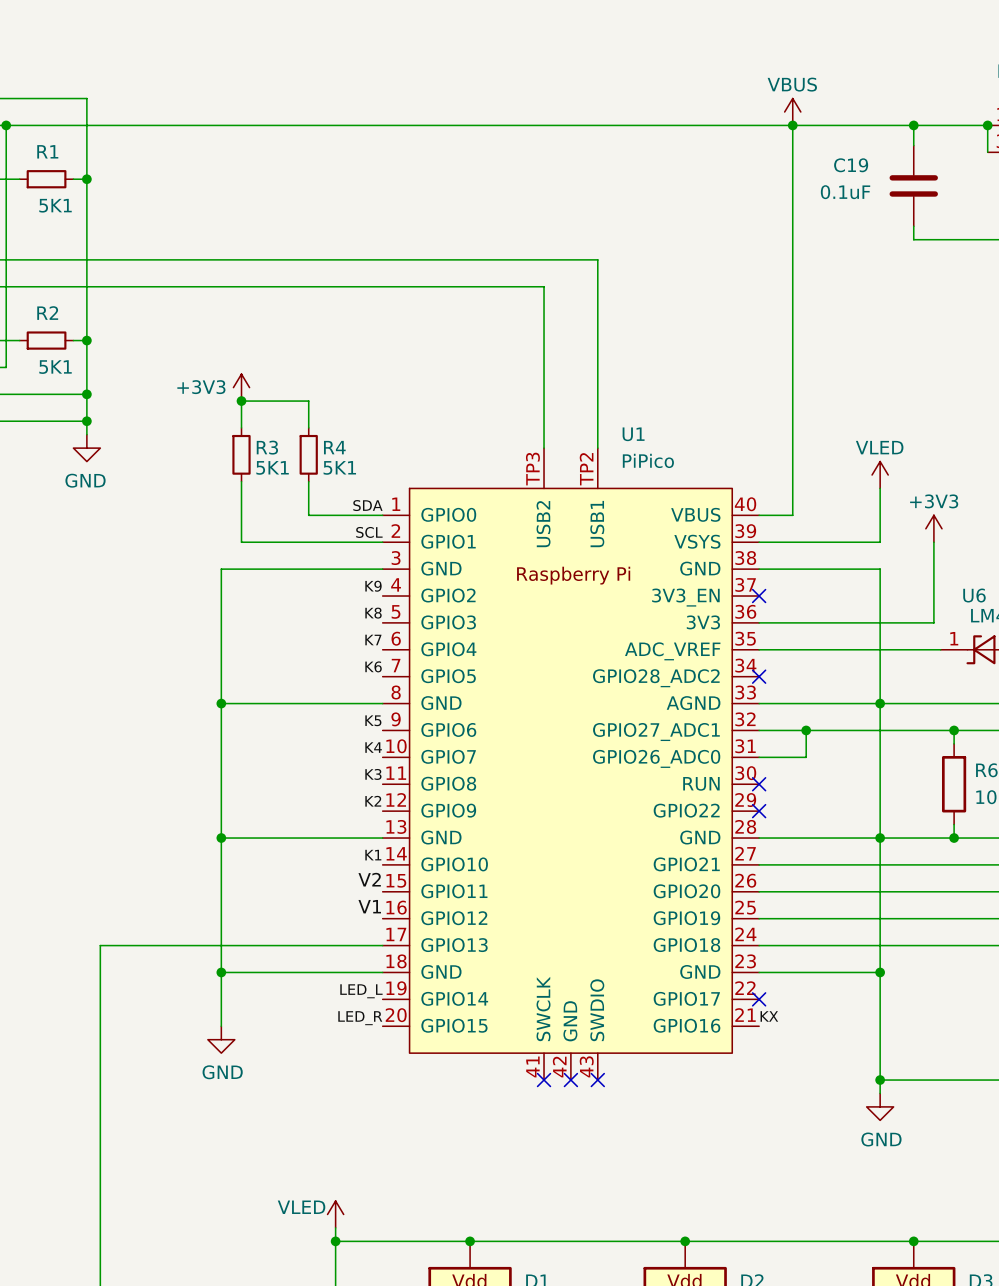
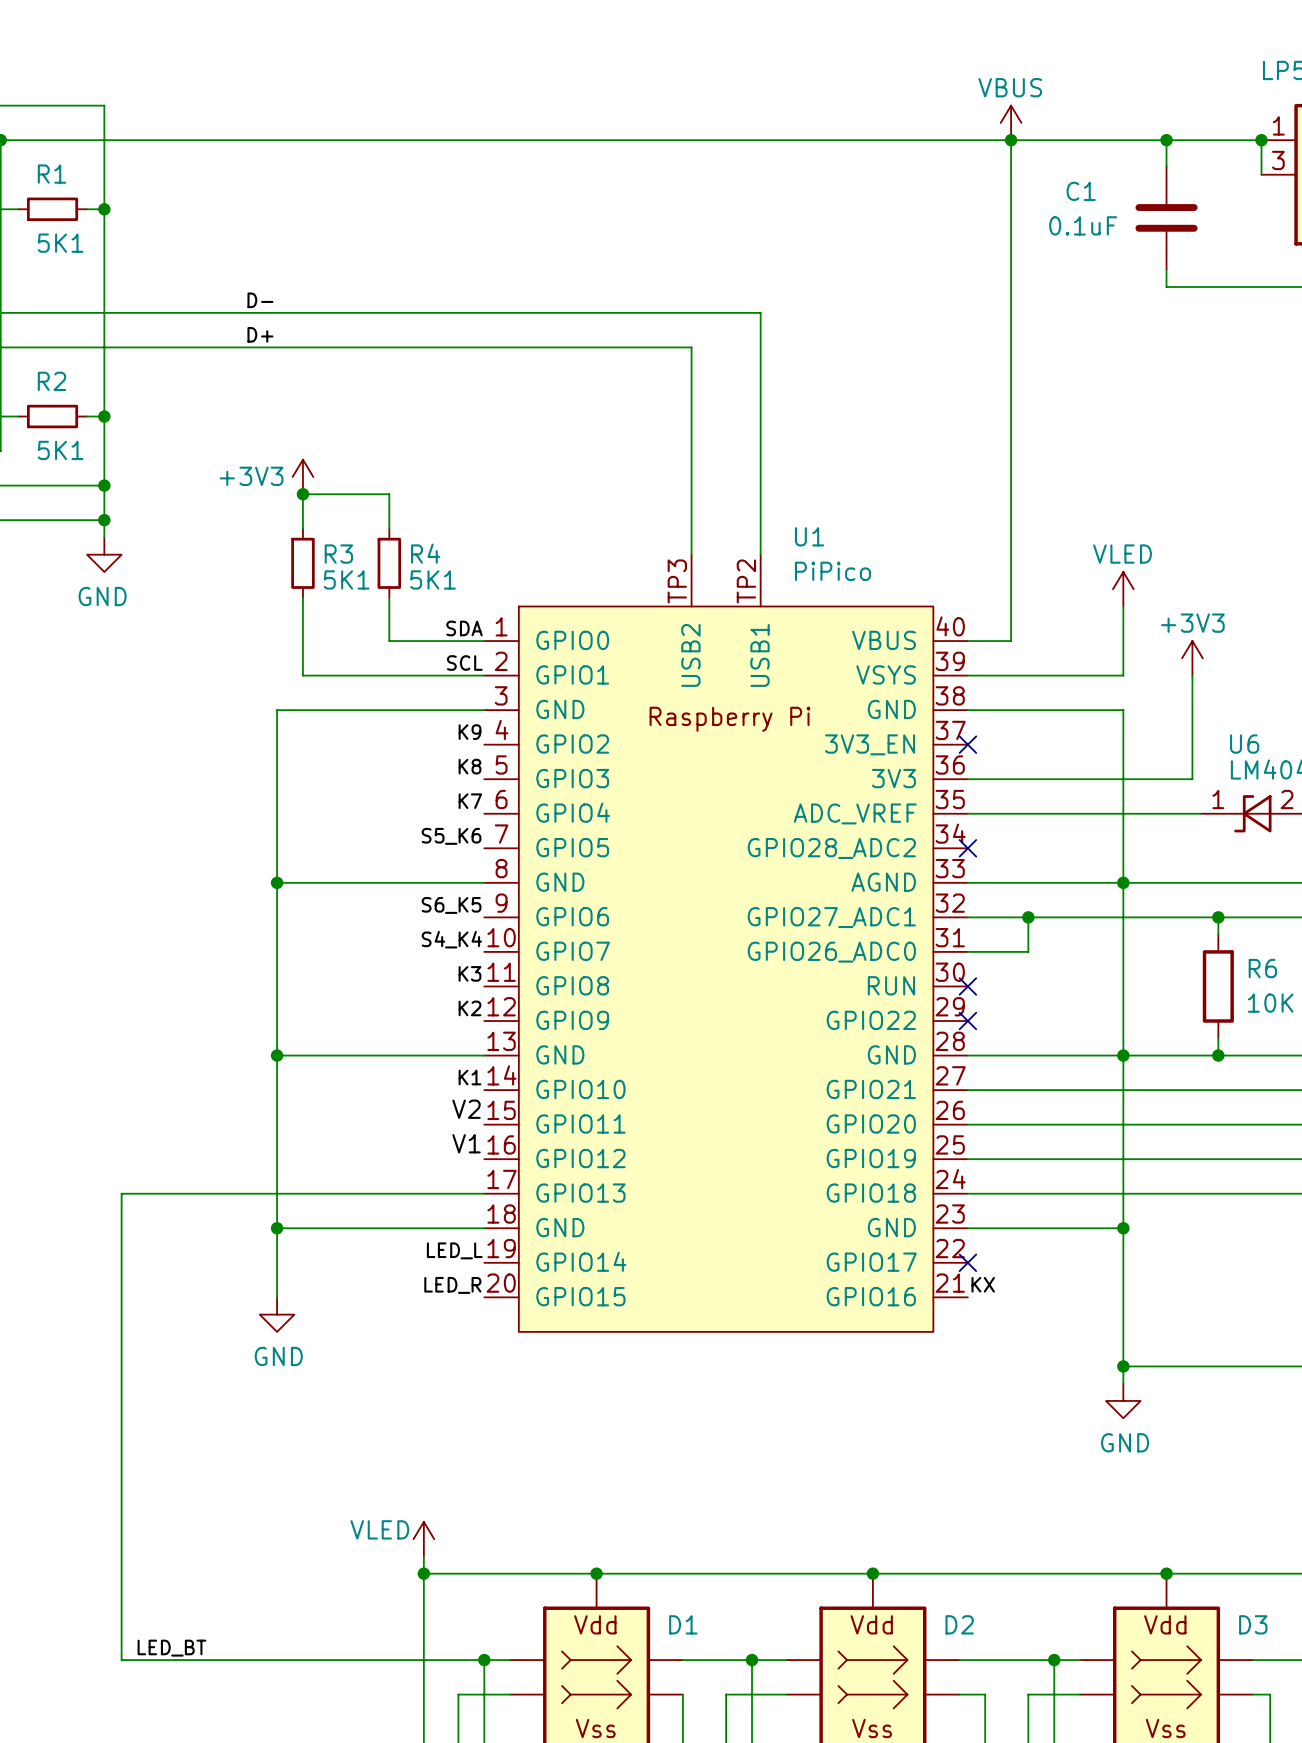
C19 name: C19 (851, 165) -> C1 (1081, 191)
label: none -> D- (260, 300)
label: none -> D+ (260, 334)
U1 symbol: [382, 448, 760, 1081] -> [484, 554, 968, 1332]
label: K6 (373, 666) -> S5_K6 (451, 836)
label: K5 (373, 720) -> S6_K5 (451, 905)
label: K4 (373, 747) -> S4_K4 (451, 939)
no-connect mark: (544, 1080) -> none
no-connect mark: (570, 1080) -> none
no-connect mark: (597, 1080) -> none

